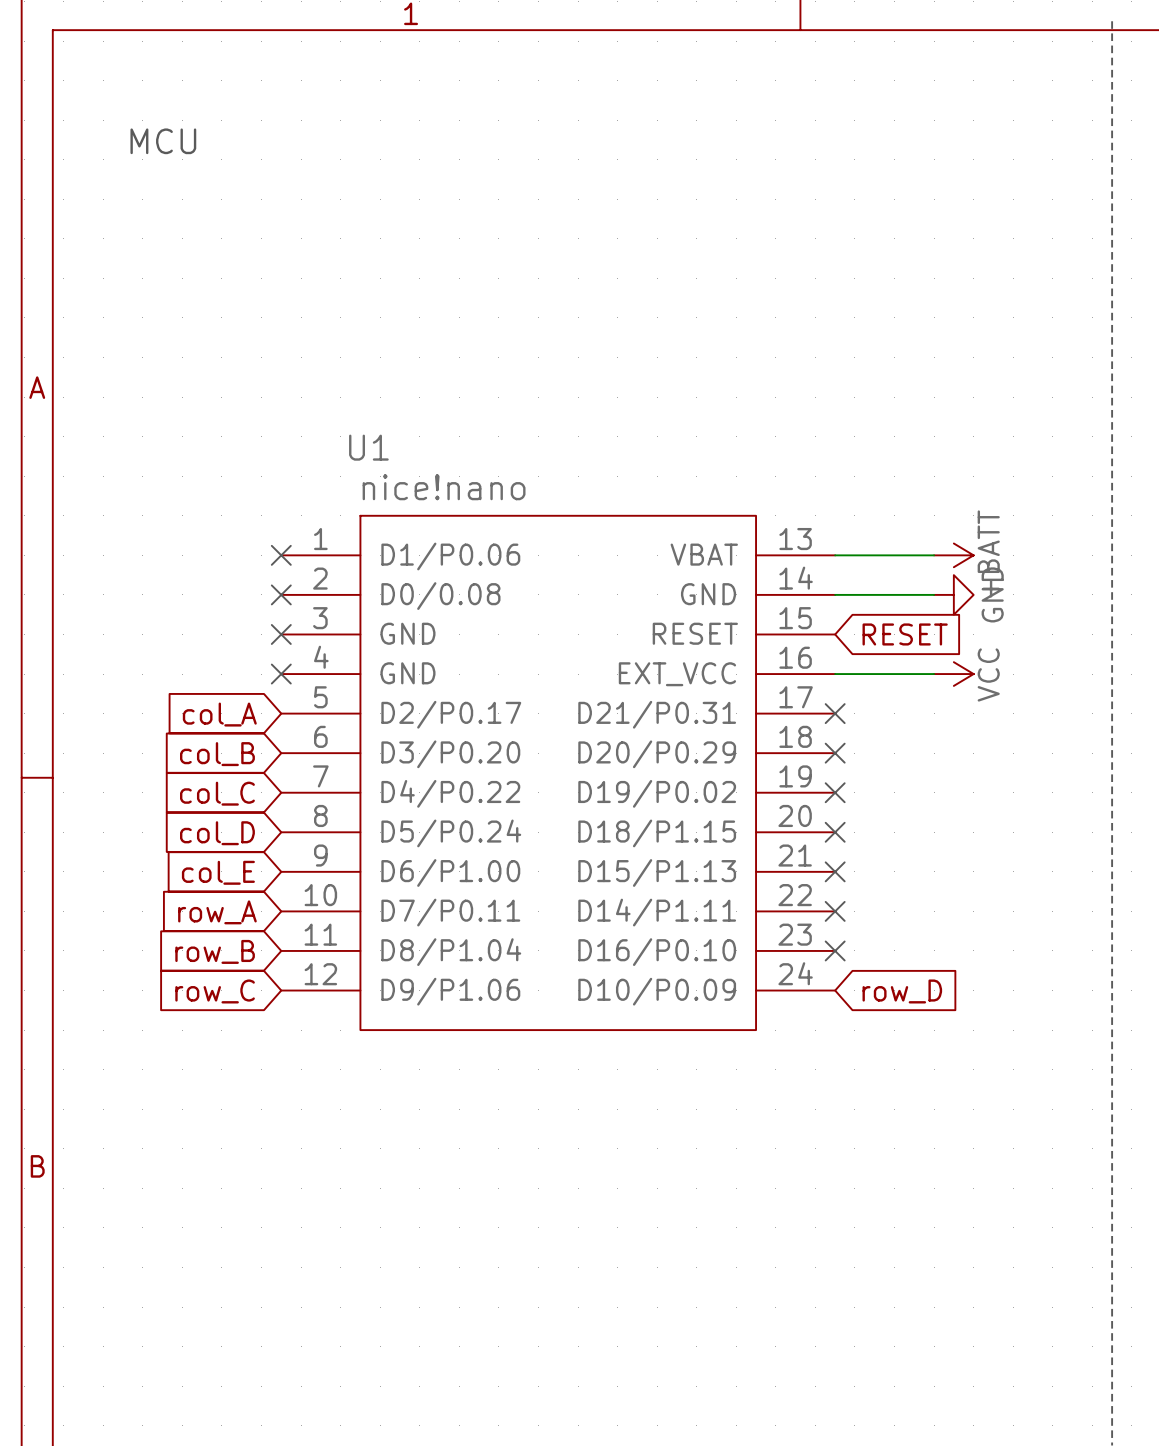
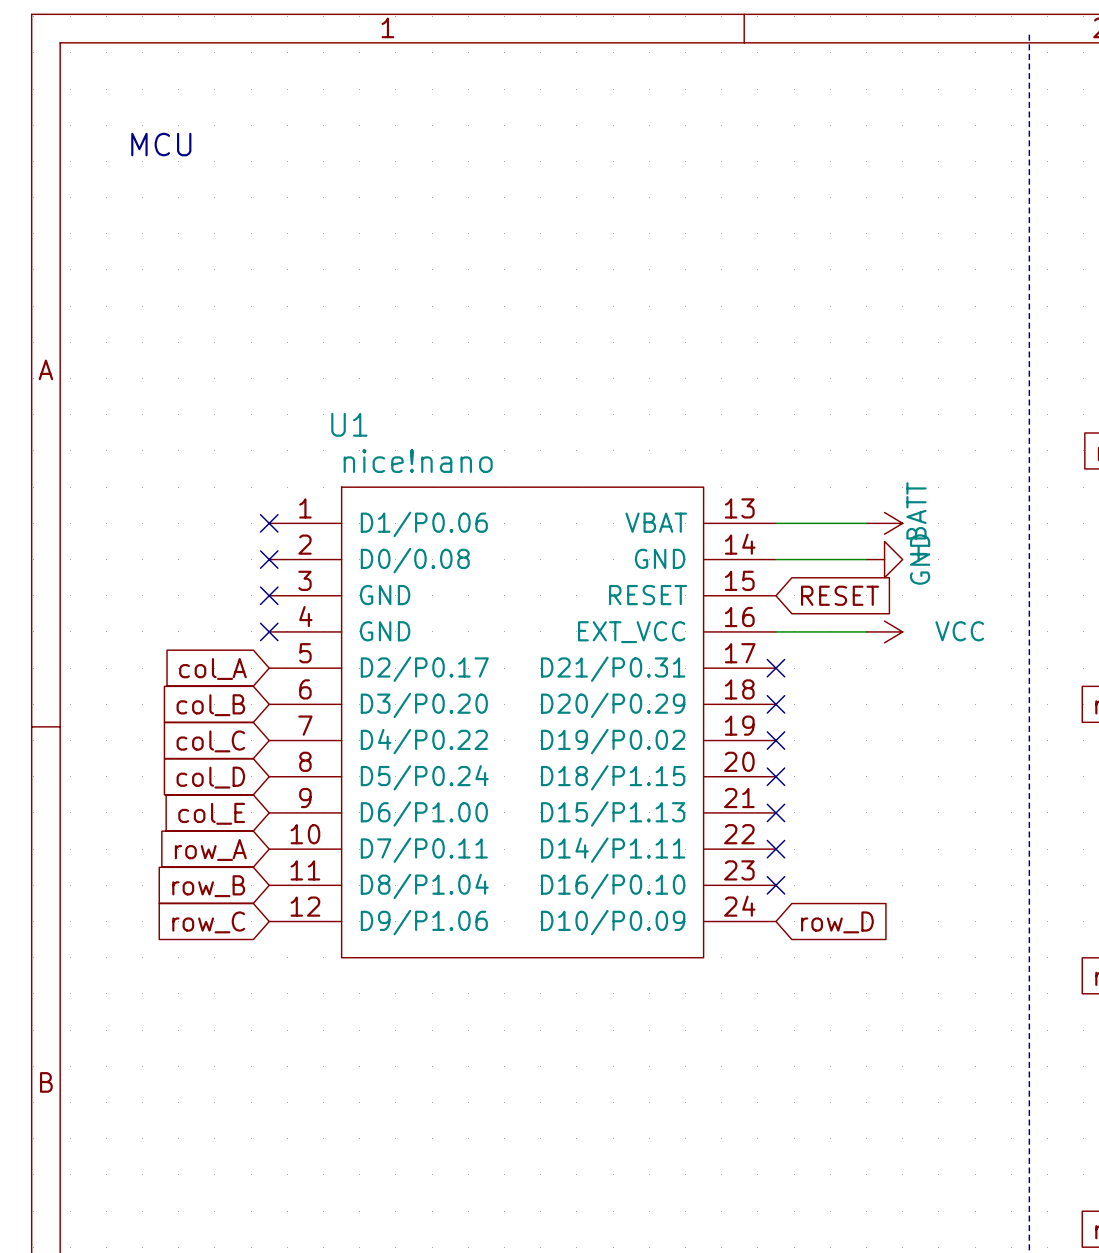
power symbol text rotation: 0° (988, 674) -> 90° clockwise (959, 631)

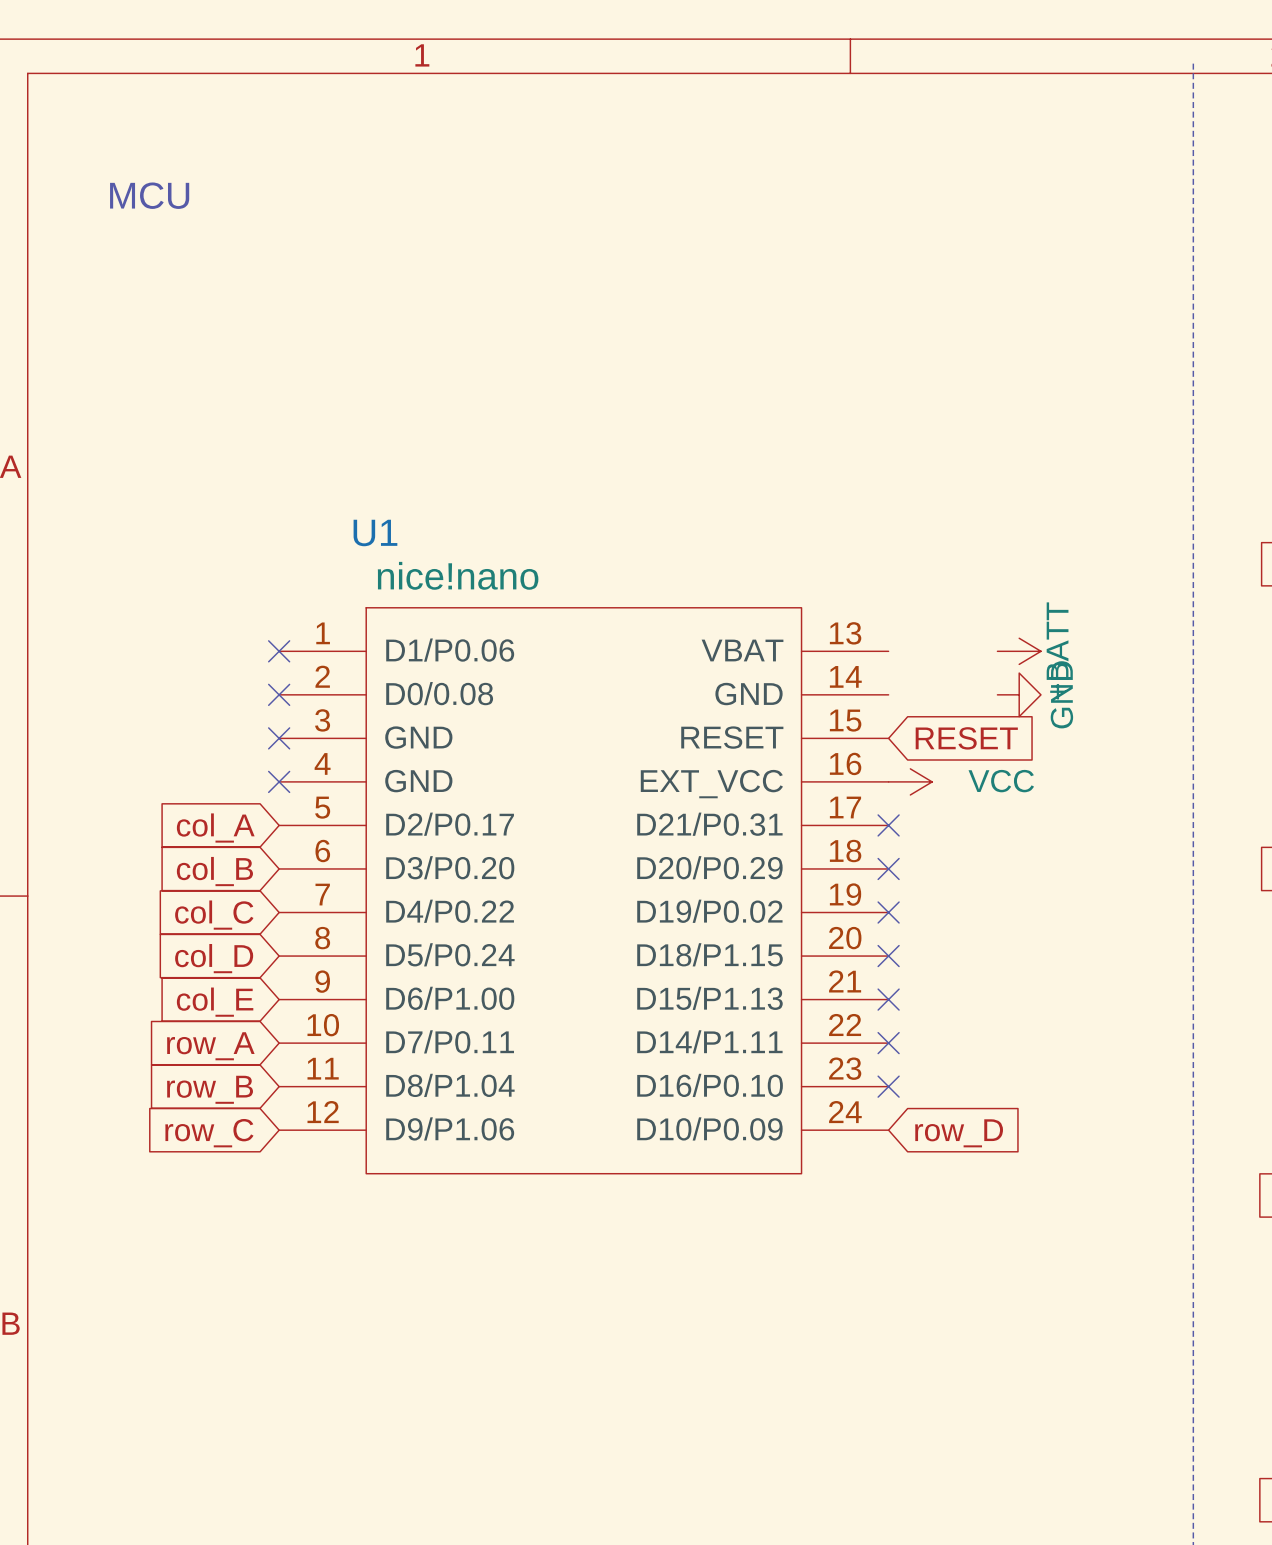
wire: (775, 523) (866, 523) -> none
wire: (775, 559) (866, 559) -> none
wire: (775, 631) (866, 631) -> none
power symbol position: VCC (884, 631) -> VCC (910, 781)

